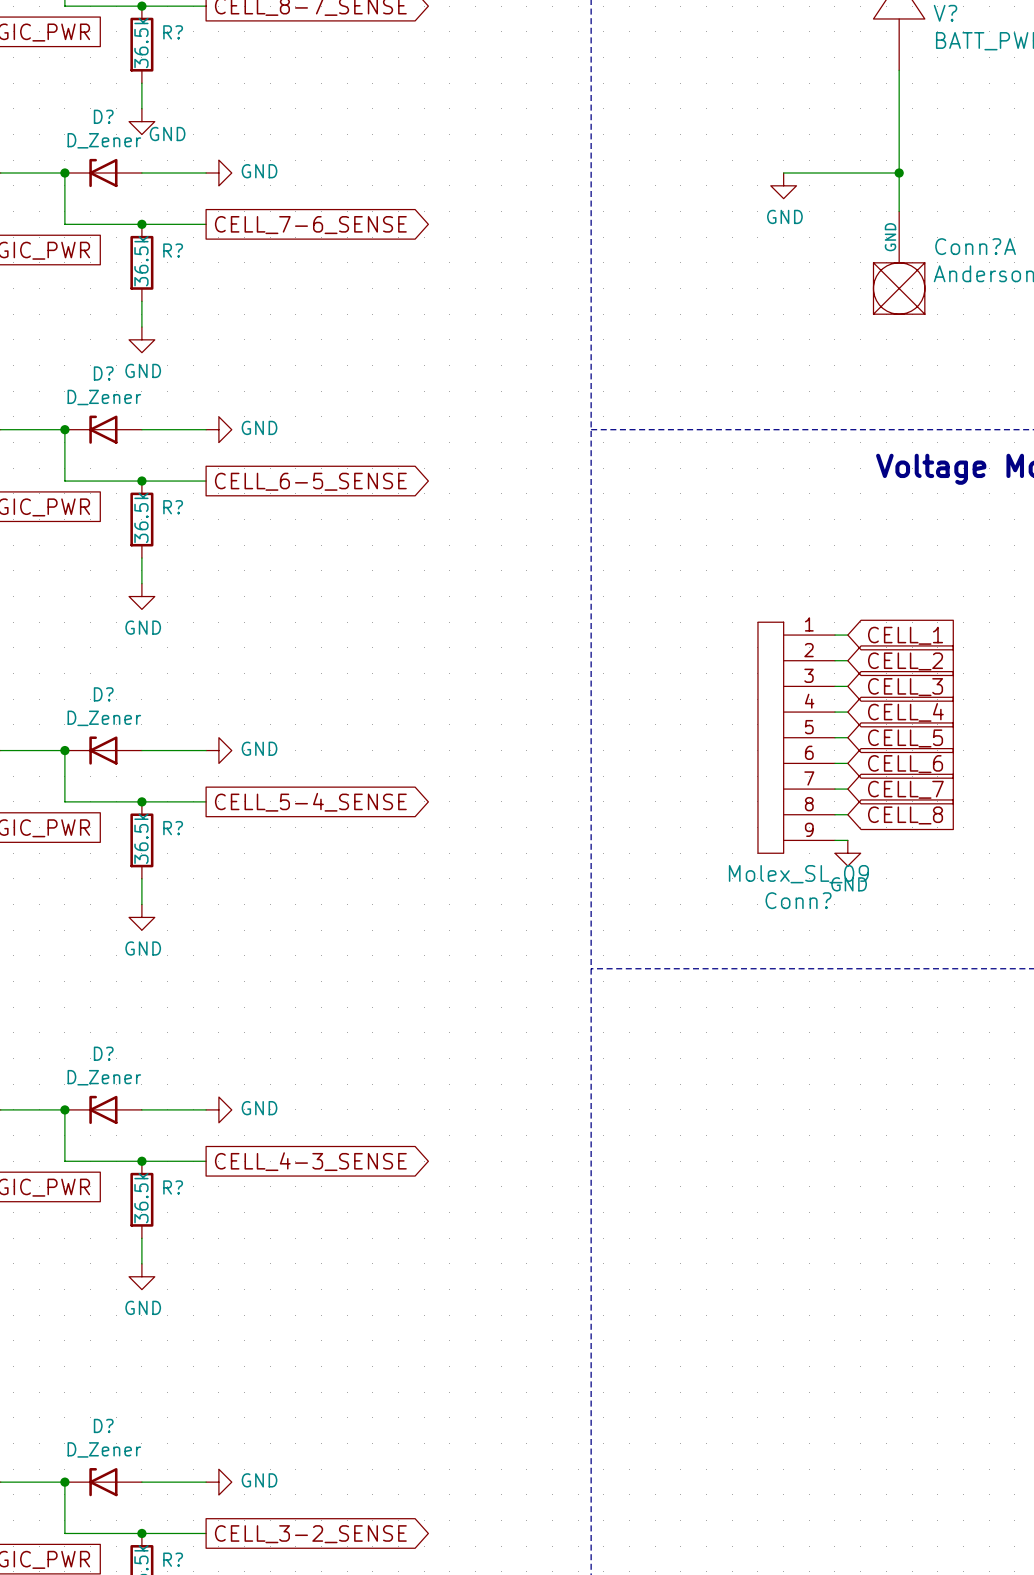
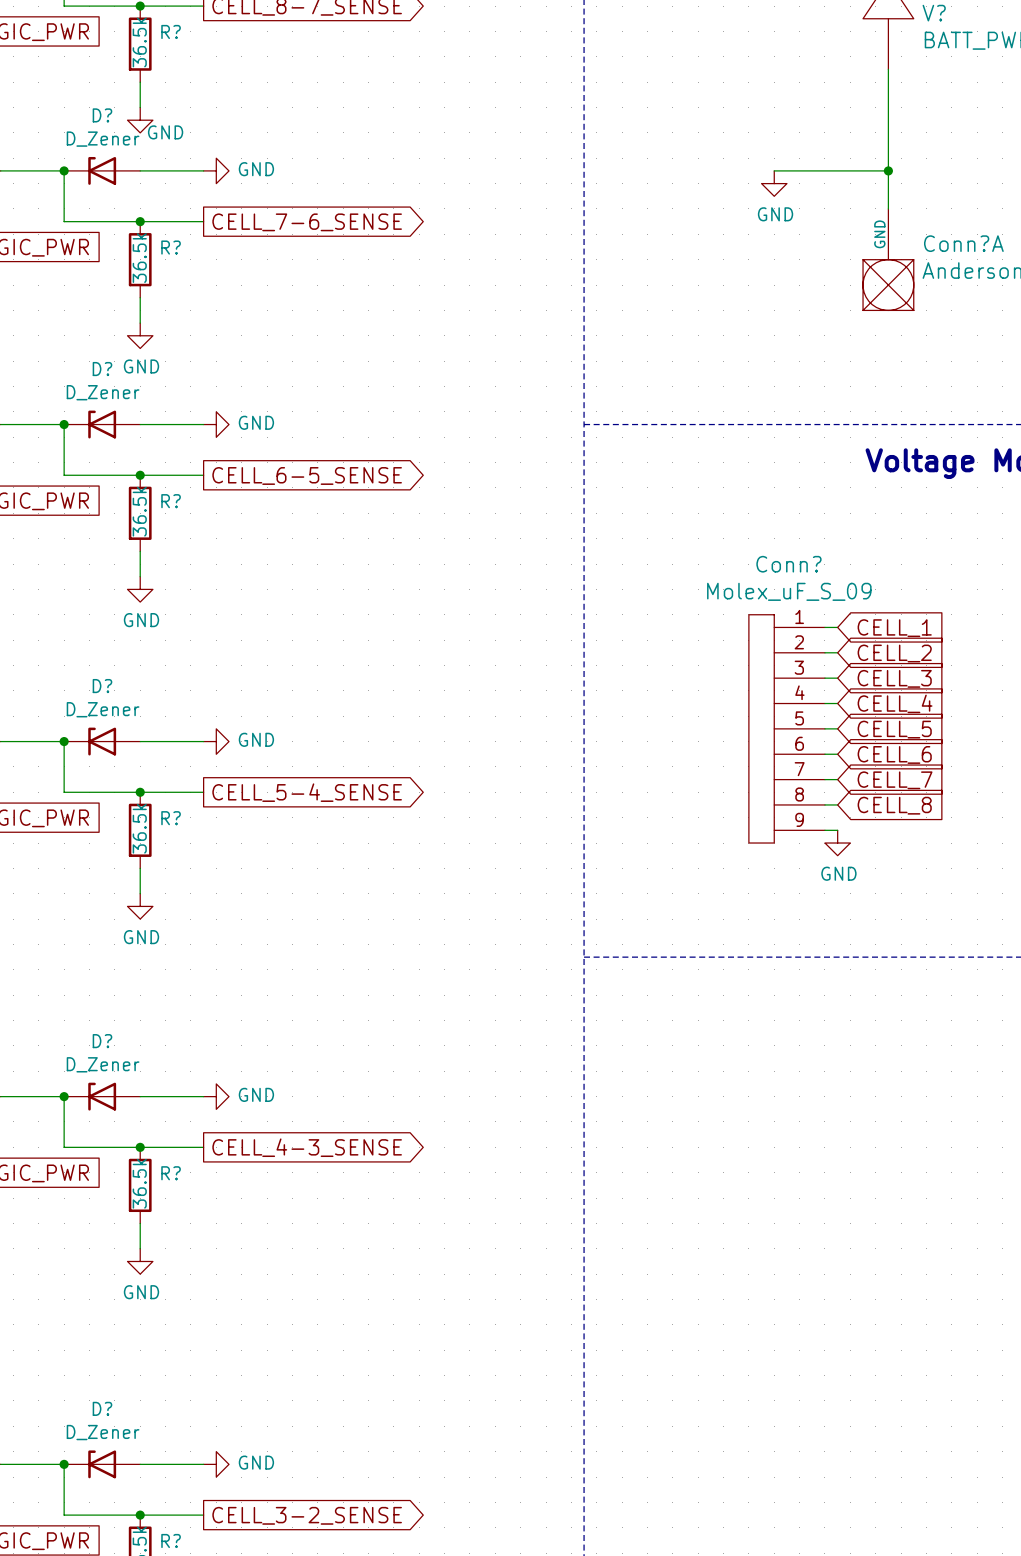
Conn? value: Molex_SL_09 (798, 874) -> Molex_uF_S_09 (789, 591)
Conn? name position: Conn? (798, 900) -> Conn? (788, 564)

